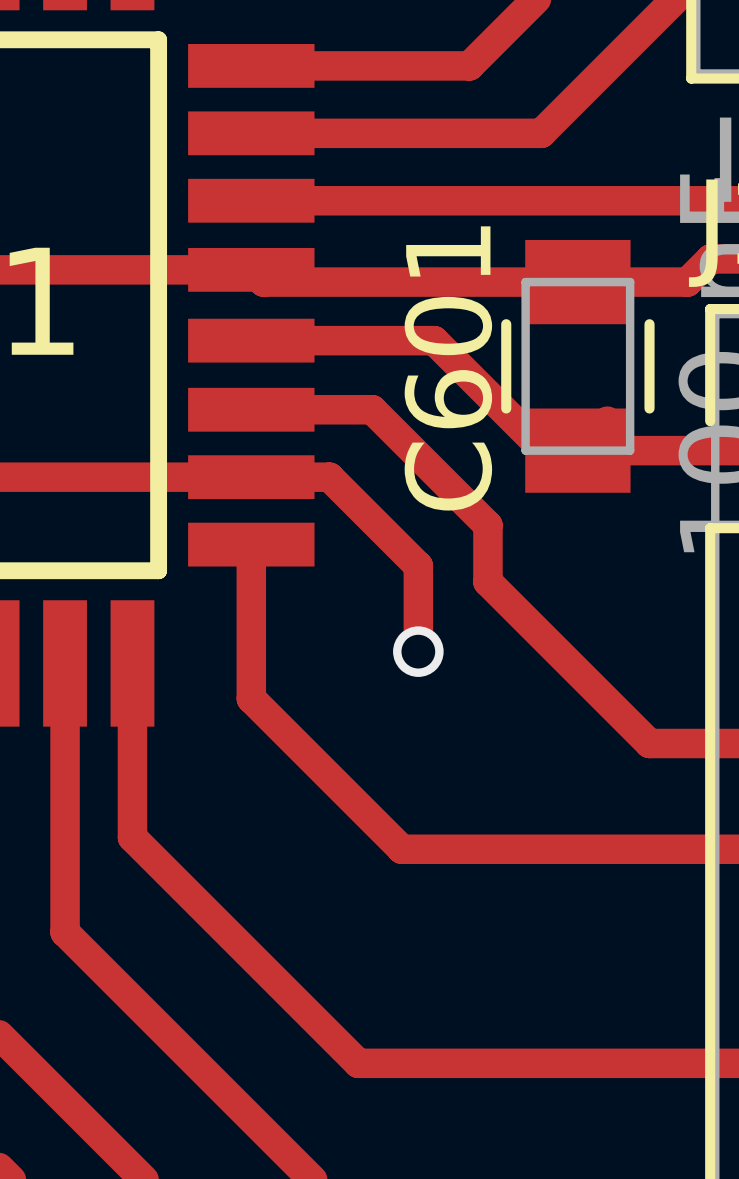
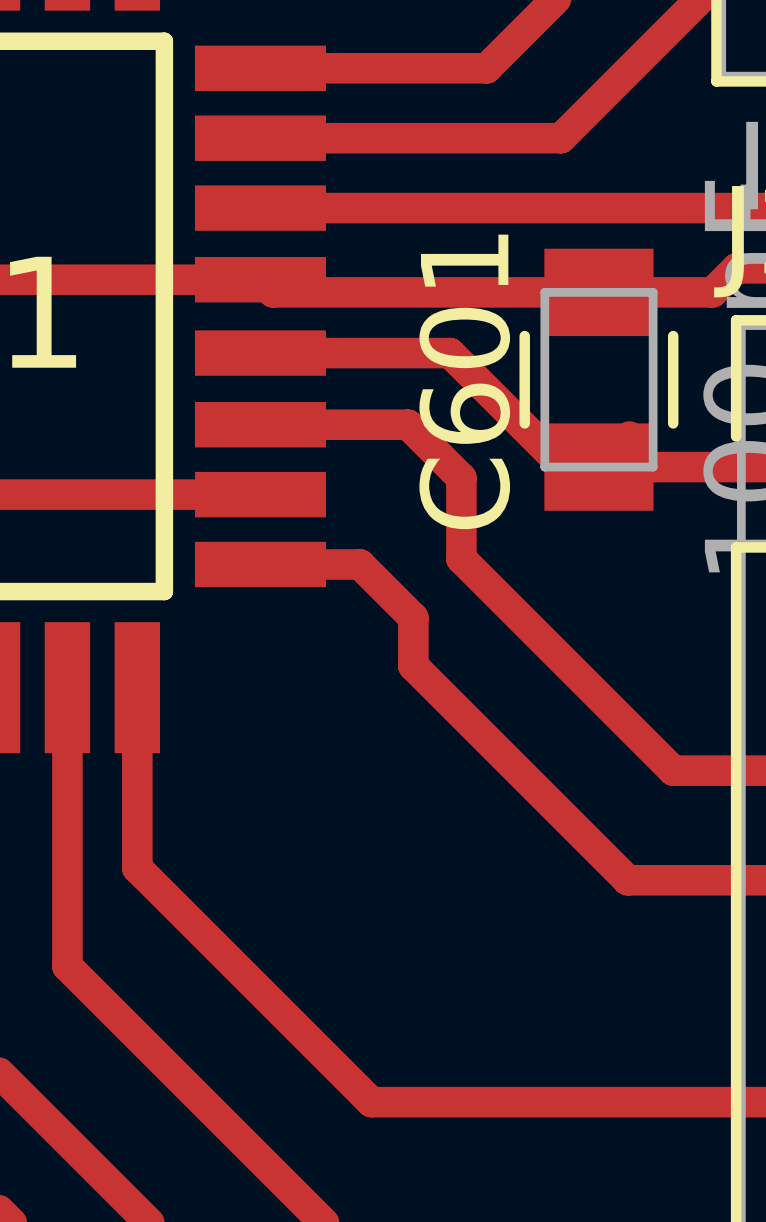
track: (372, 409) (487, 525) (487, 581) -> (385, 424) (408, 424) (461, 478) (461, 558) (505, 603)
track: (251, 477) (329, 477) (418, 566) (418, 651) -> none
track: (251, 544) (251, 698) (401, 849) (605, 849) -> (260, 564) (360, 564) (413, 617) (413, 665) (627, 880)
via: (418, 651) -> none

